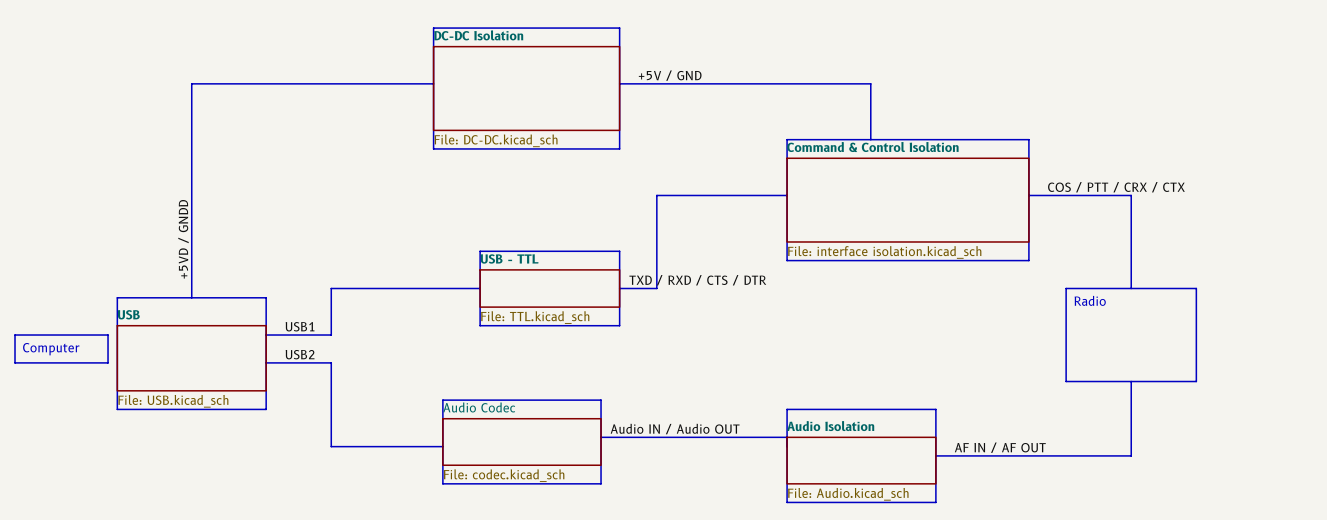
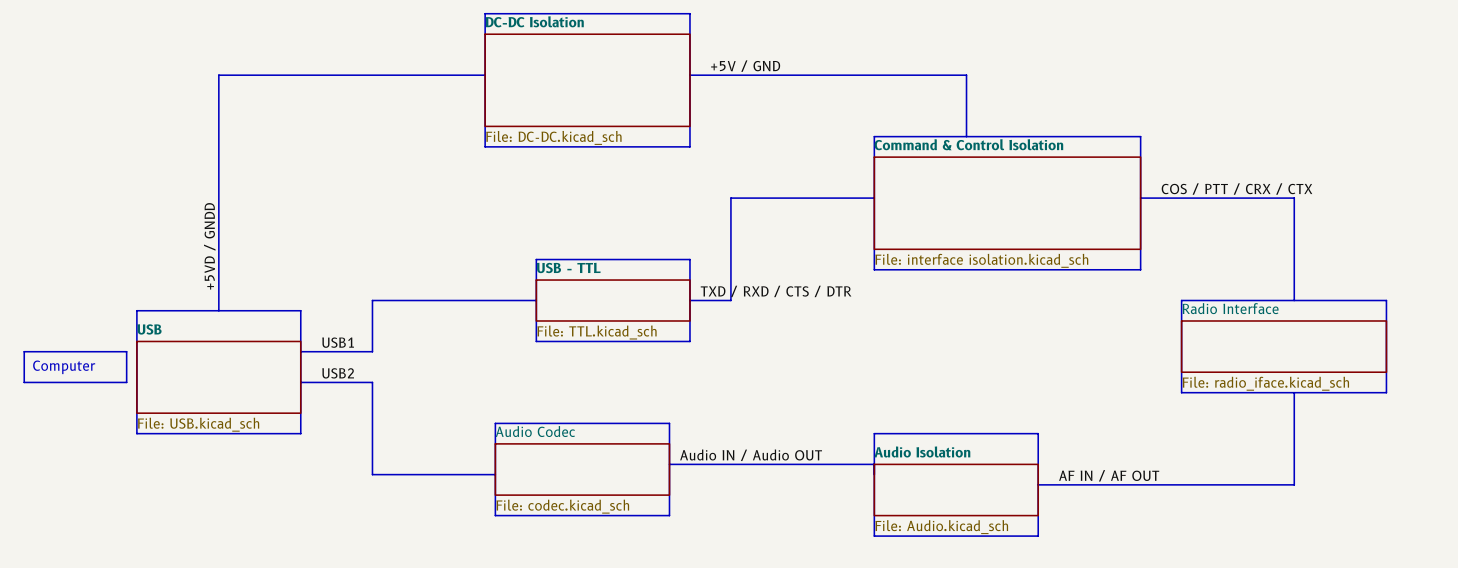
line: (1131, 195) (1131, 288) -> (1253, 198) (1294, 198) (1294, 300)
line: (1196, 288) (1196, 381) (1066, 381) (1066, 372) -> (1324, 300) (1386, 300) (1386, 392) (1181, 392)
text: Radio (1090, 300) -> none
sheet Radio Interface: none -> File: radio_iface.kicad_sch (1284, 346)
line: (1131, 381) (1131, 455) -> (1294, 392) (1294, 484) (1253, 484)

